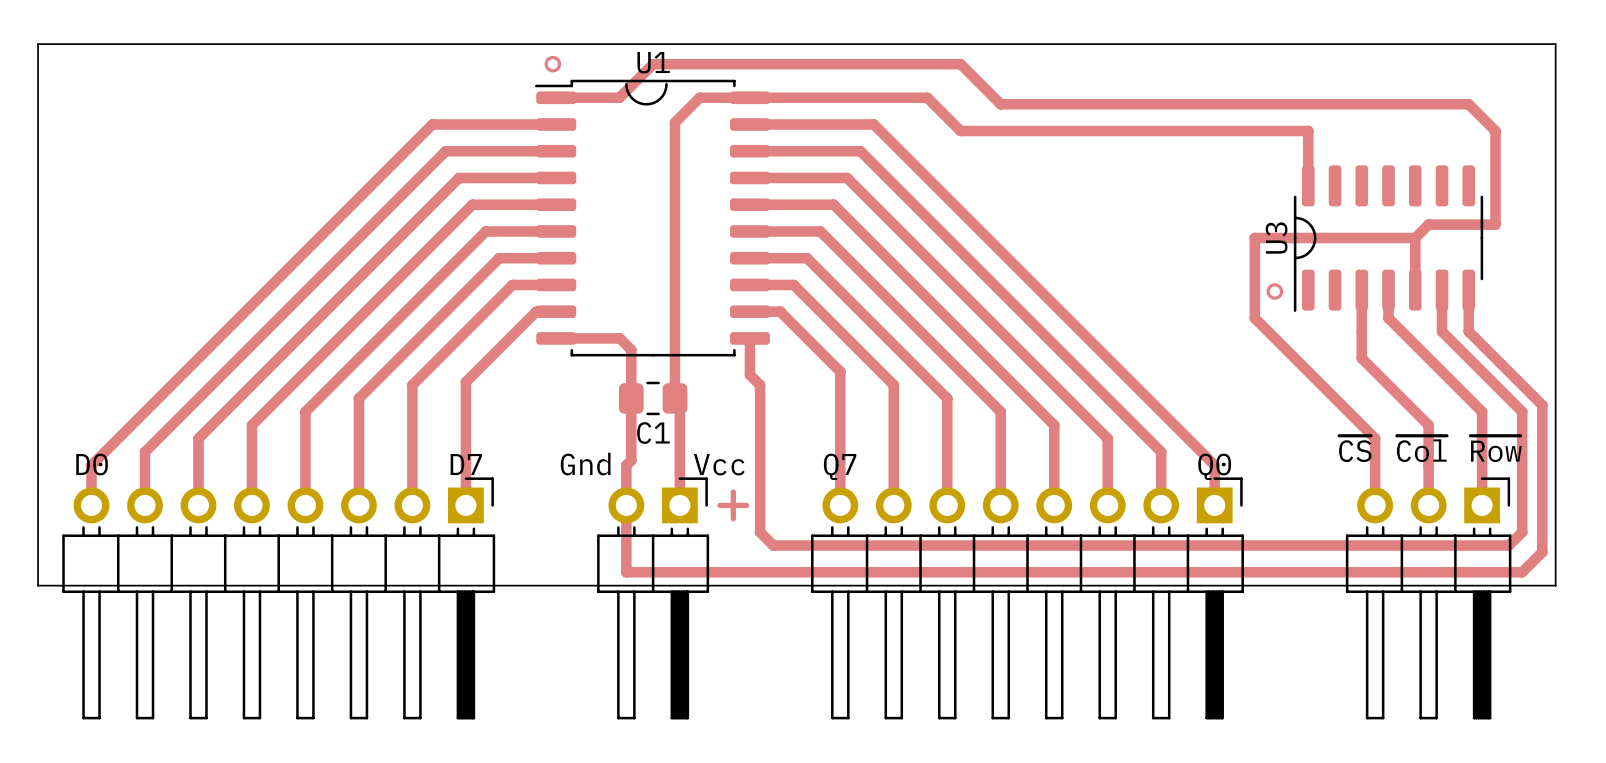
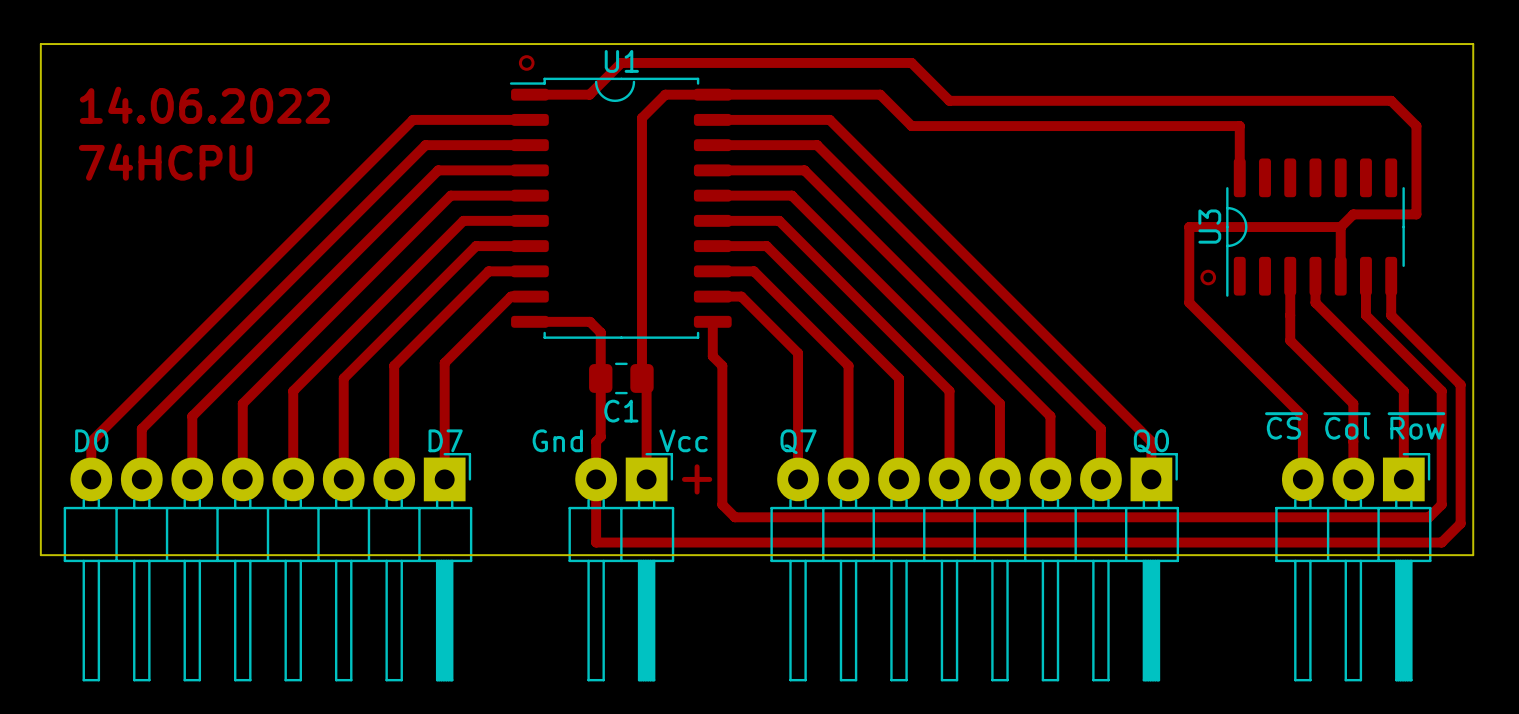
text: none -> 14.06.2022 (204, 105)
text: none -> 74HCPU (165, 162)
part footprint: [62, 477, 496, 720] -> [63, 453, 473, 682]
part footprint: [597, 477, 710, 720] -> [568, 453, 675, 682]
part footprint: [811, 477, 1244, 720] -> [770, 453, 1180, 682]
part footprint: [1345, 477, 1512, 720] -> [1275, 453, 1432, 682]

